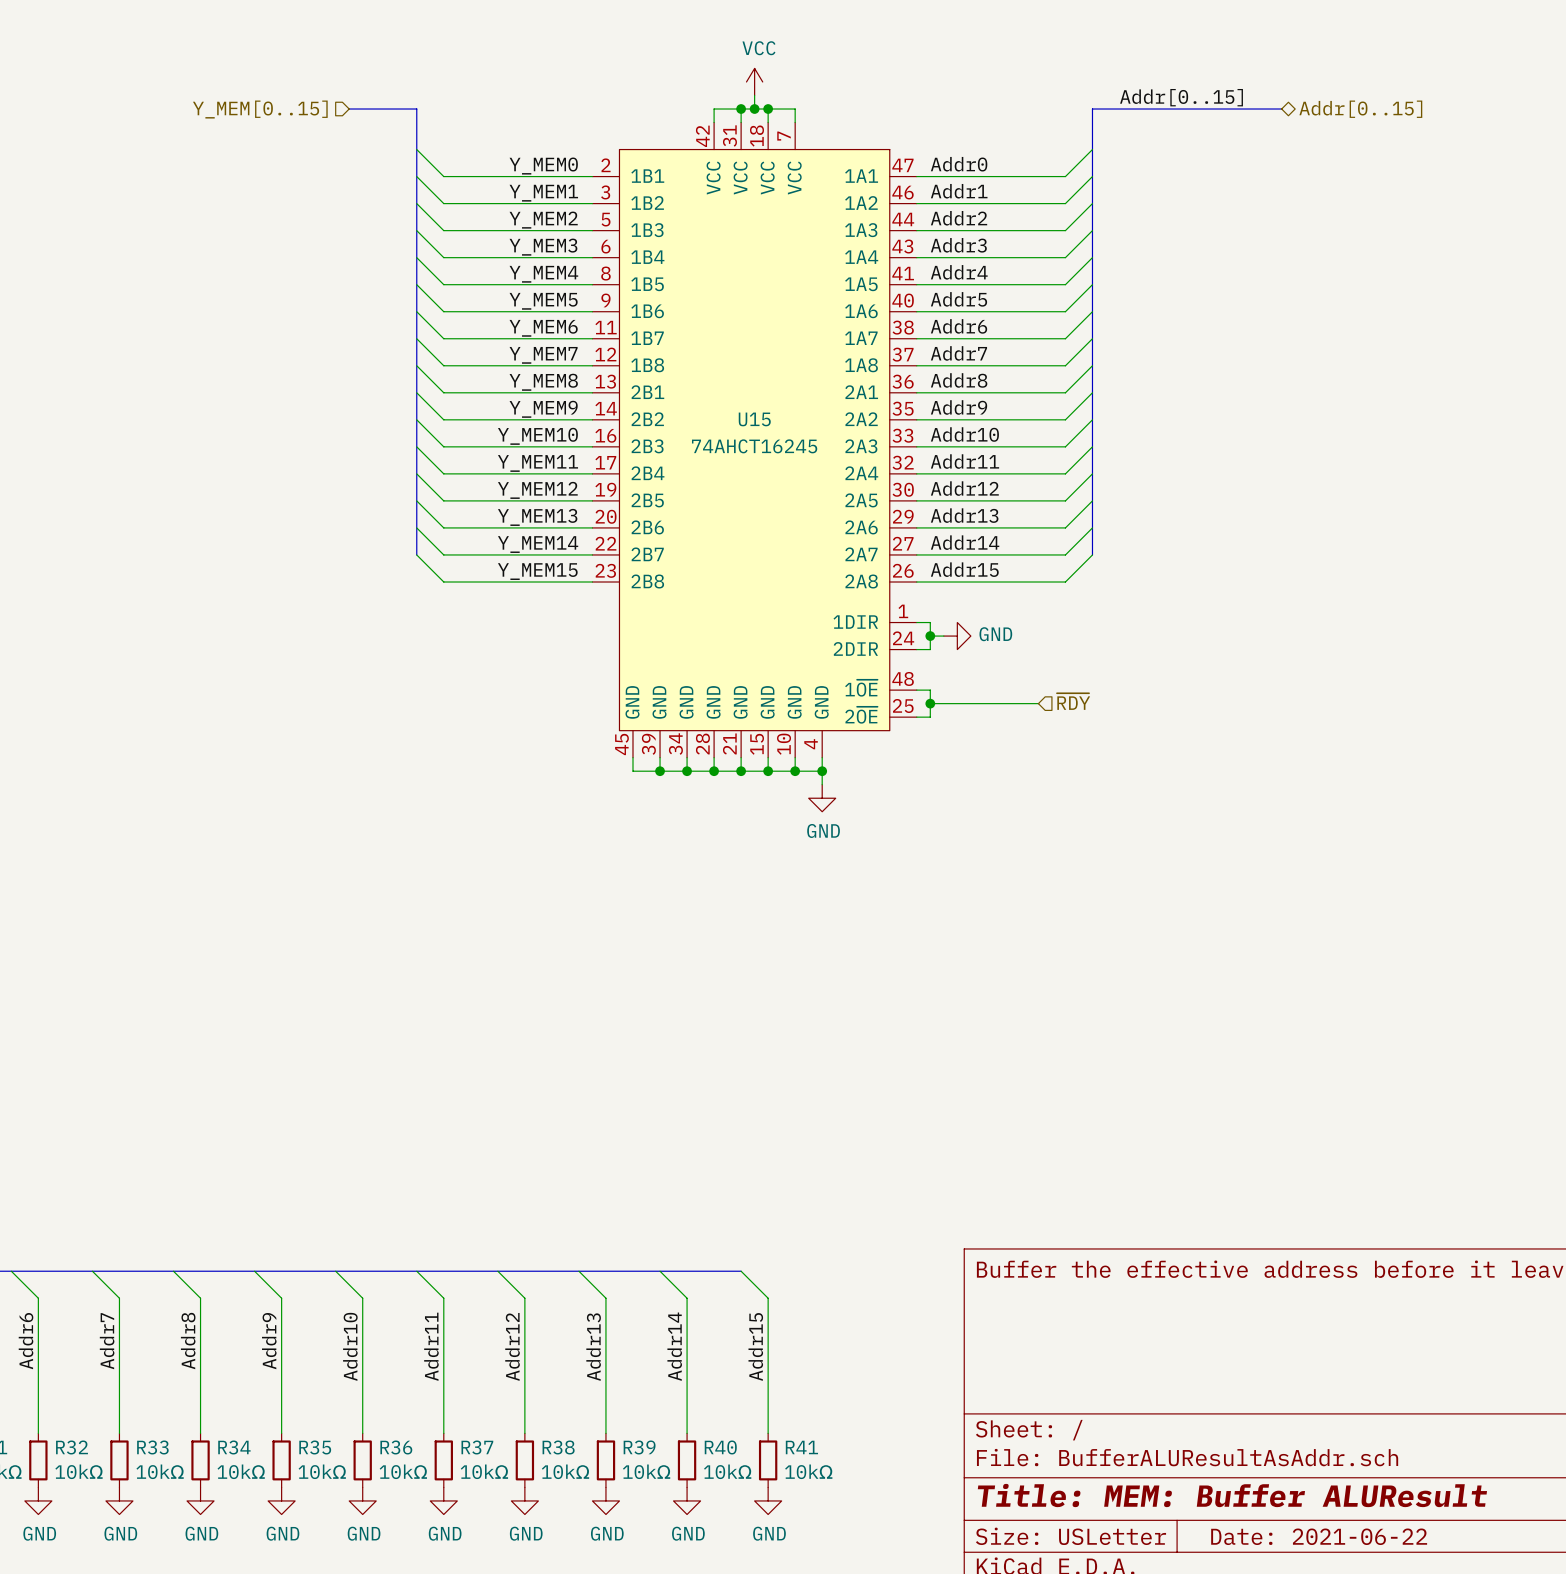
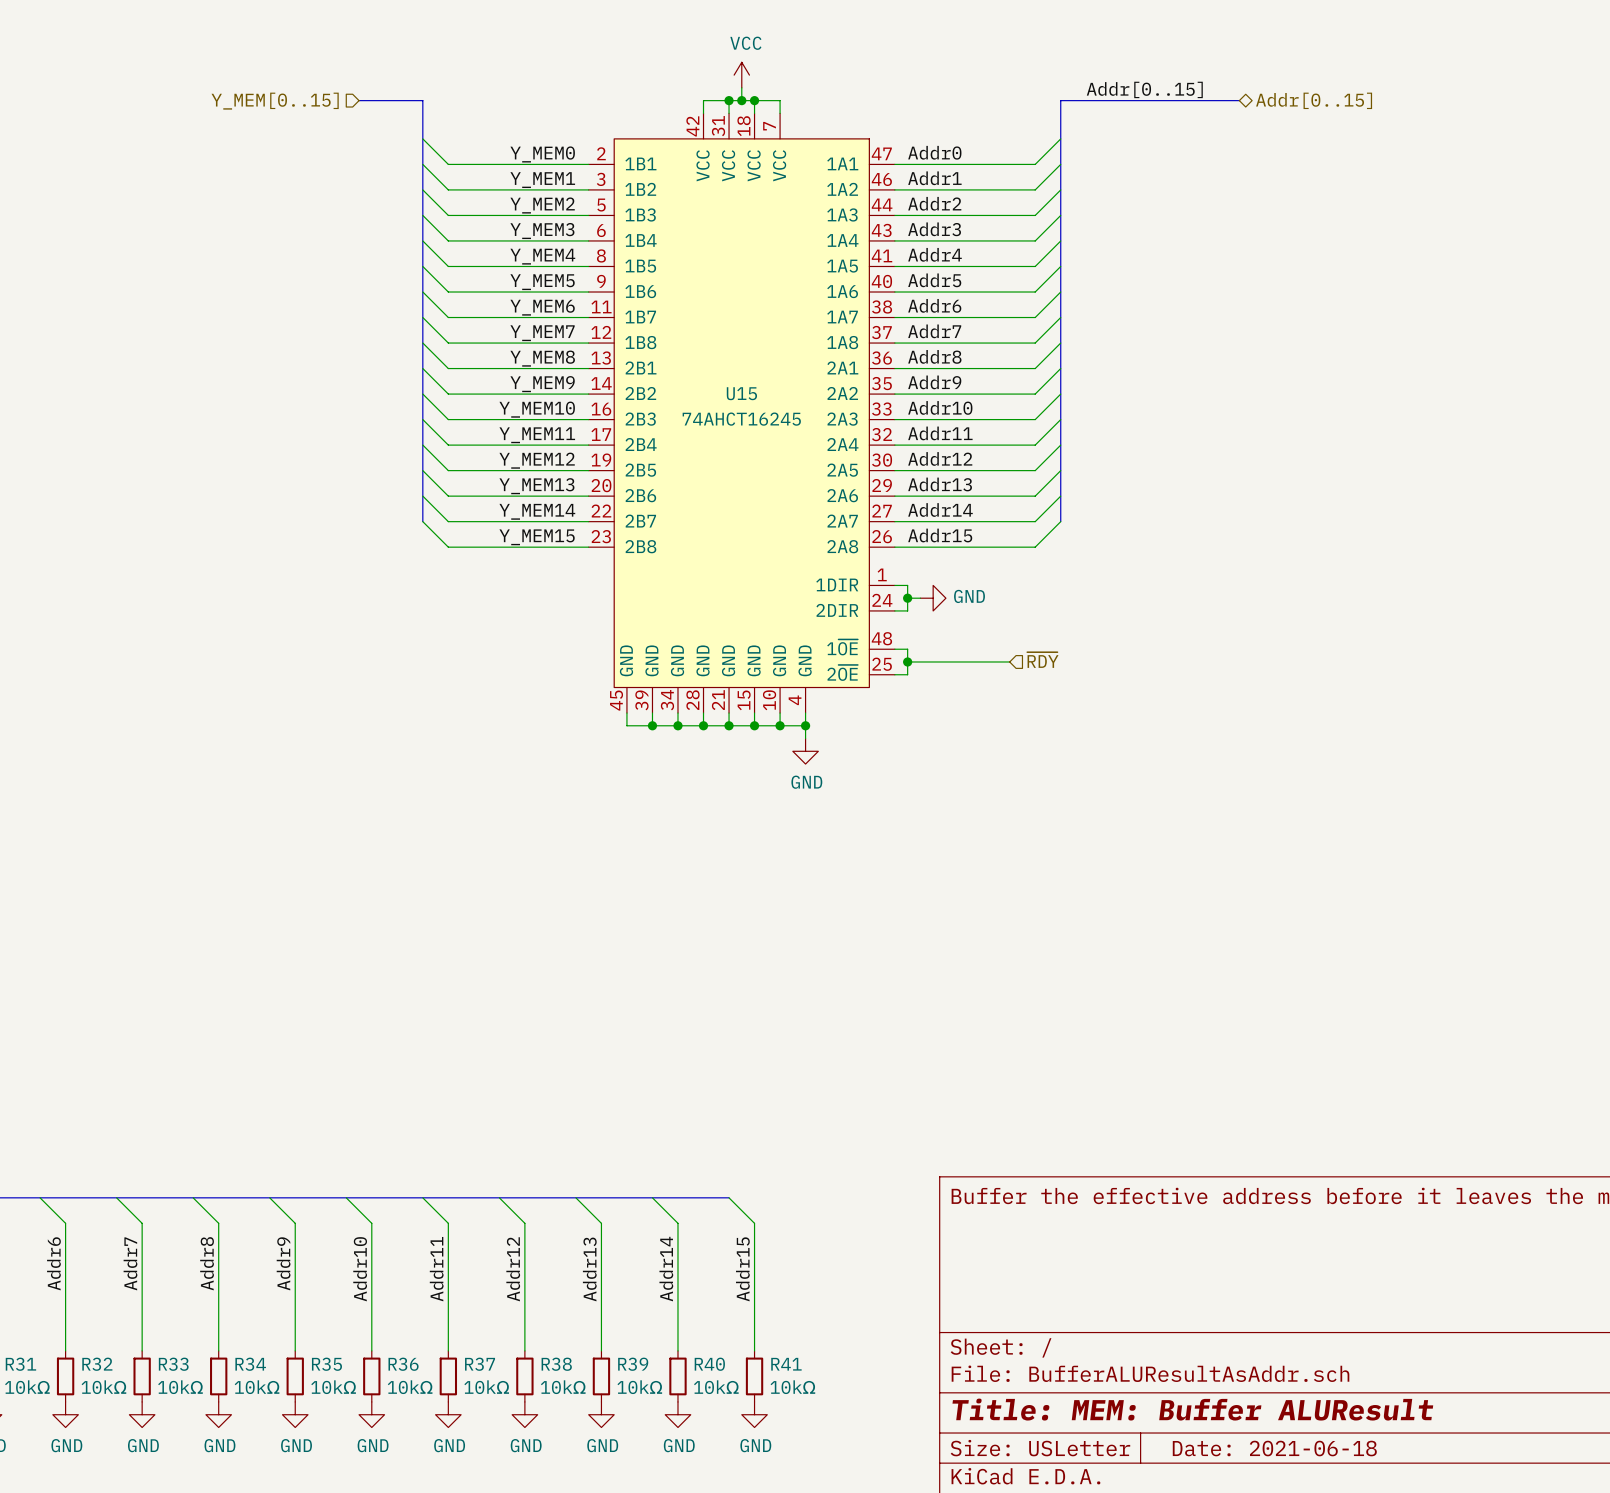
title block: Date: 2021-06-22 (1319, 1536) -> Date: 2021-06-18 (1274, 1448)

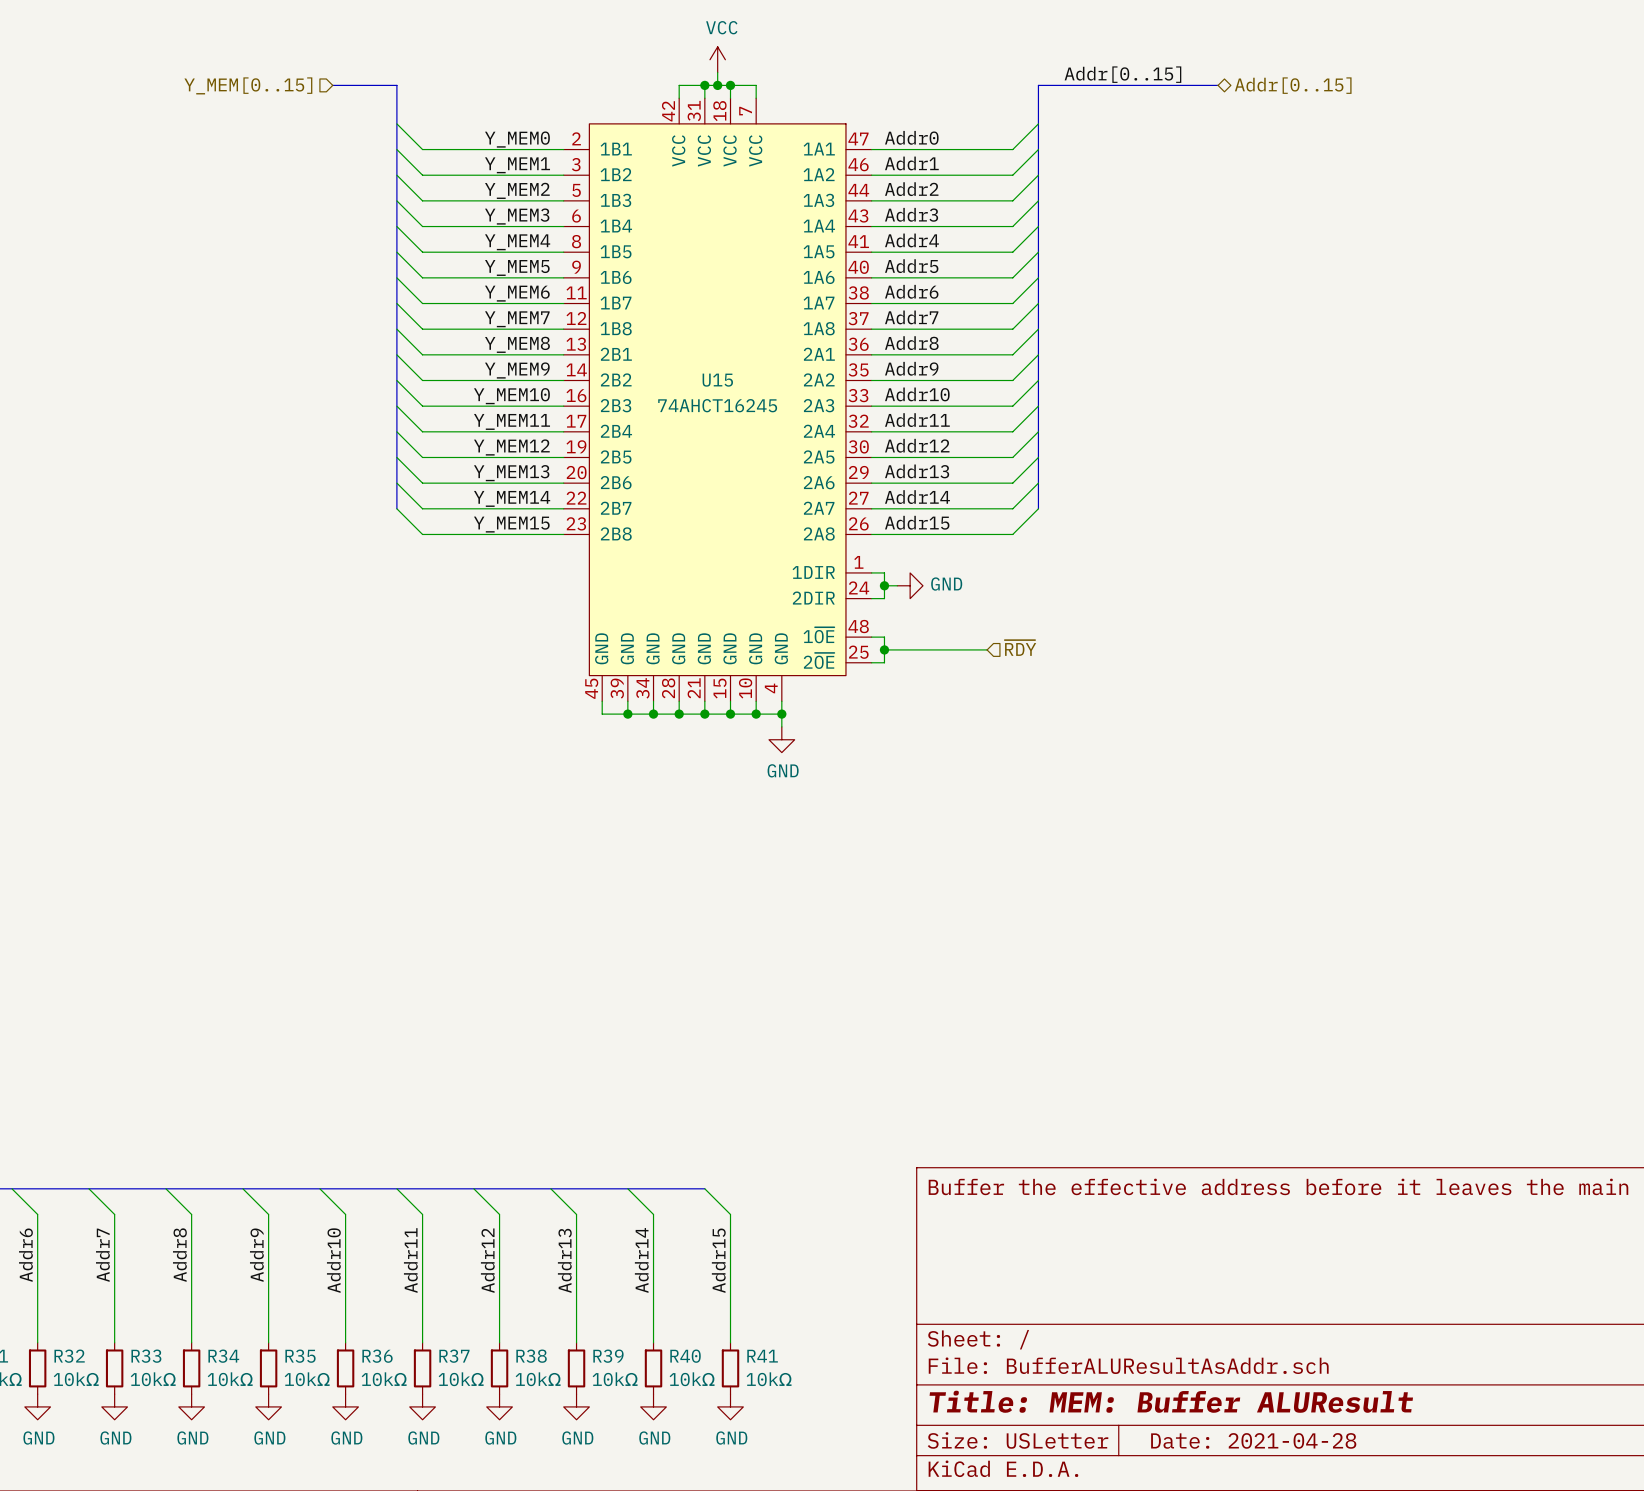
title block: Date: 2021-06-18 (1274, 1448) -> Date: 2021-04-28 (1253, 1440)

